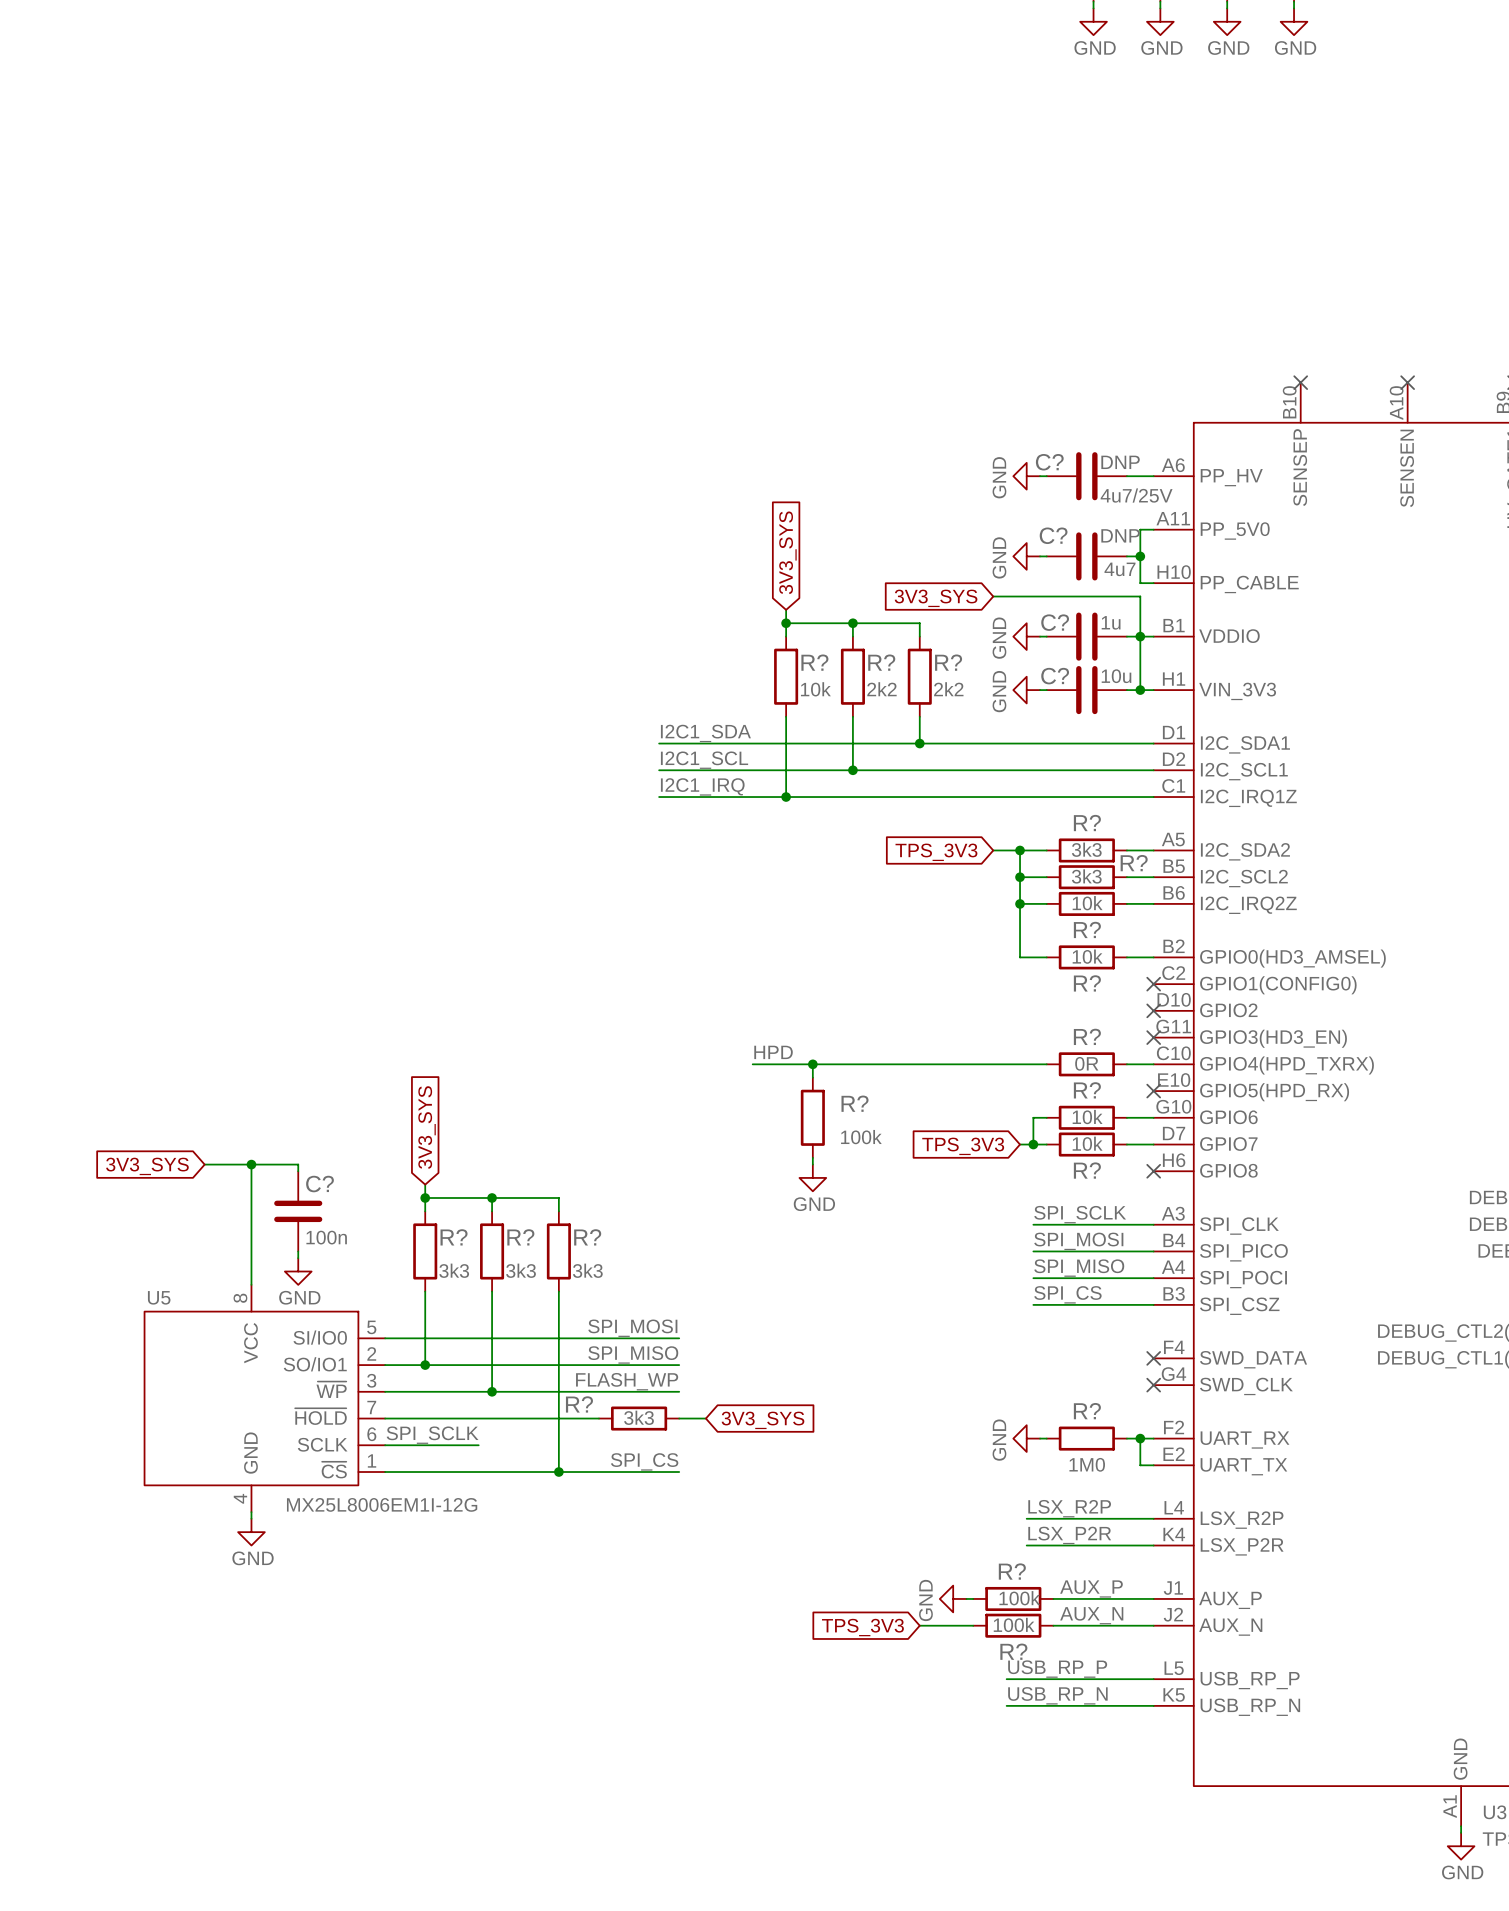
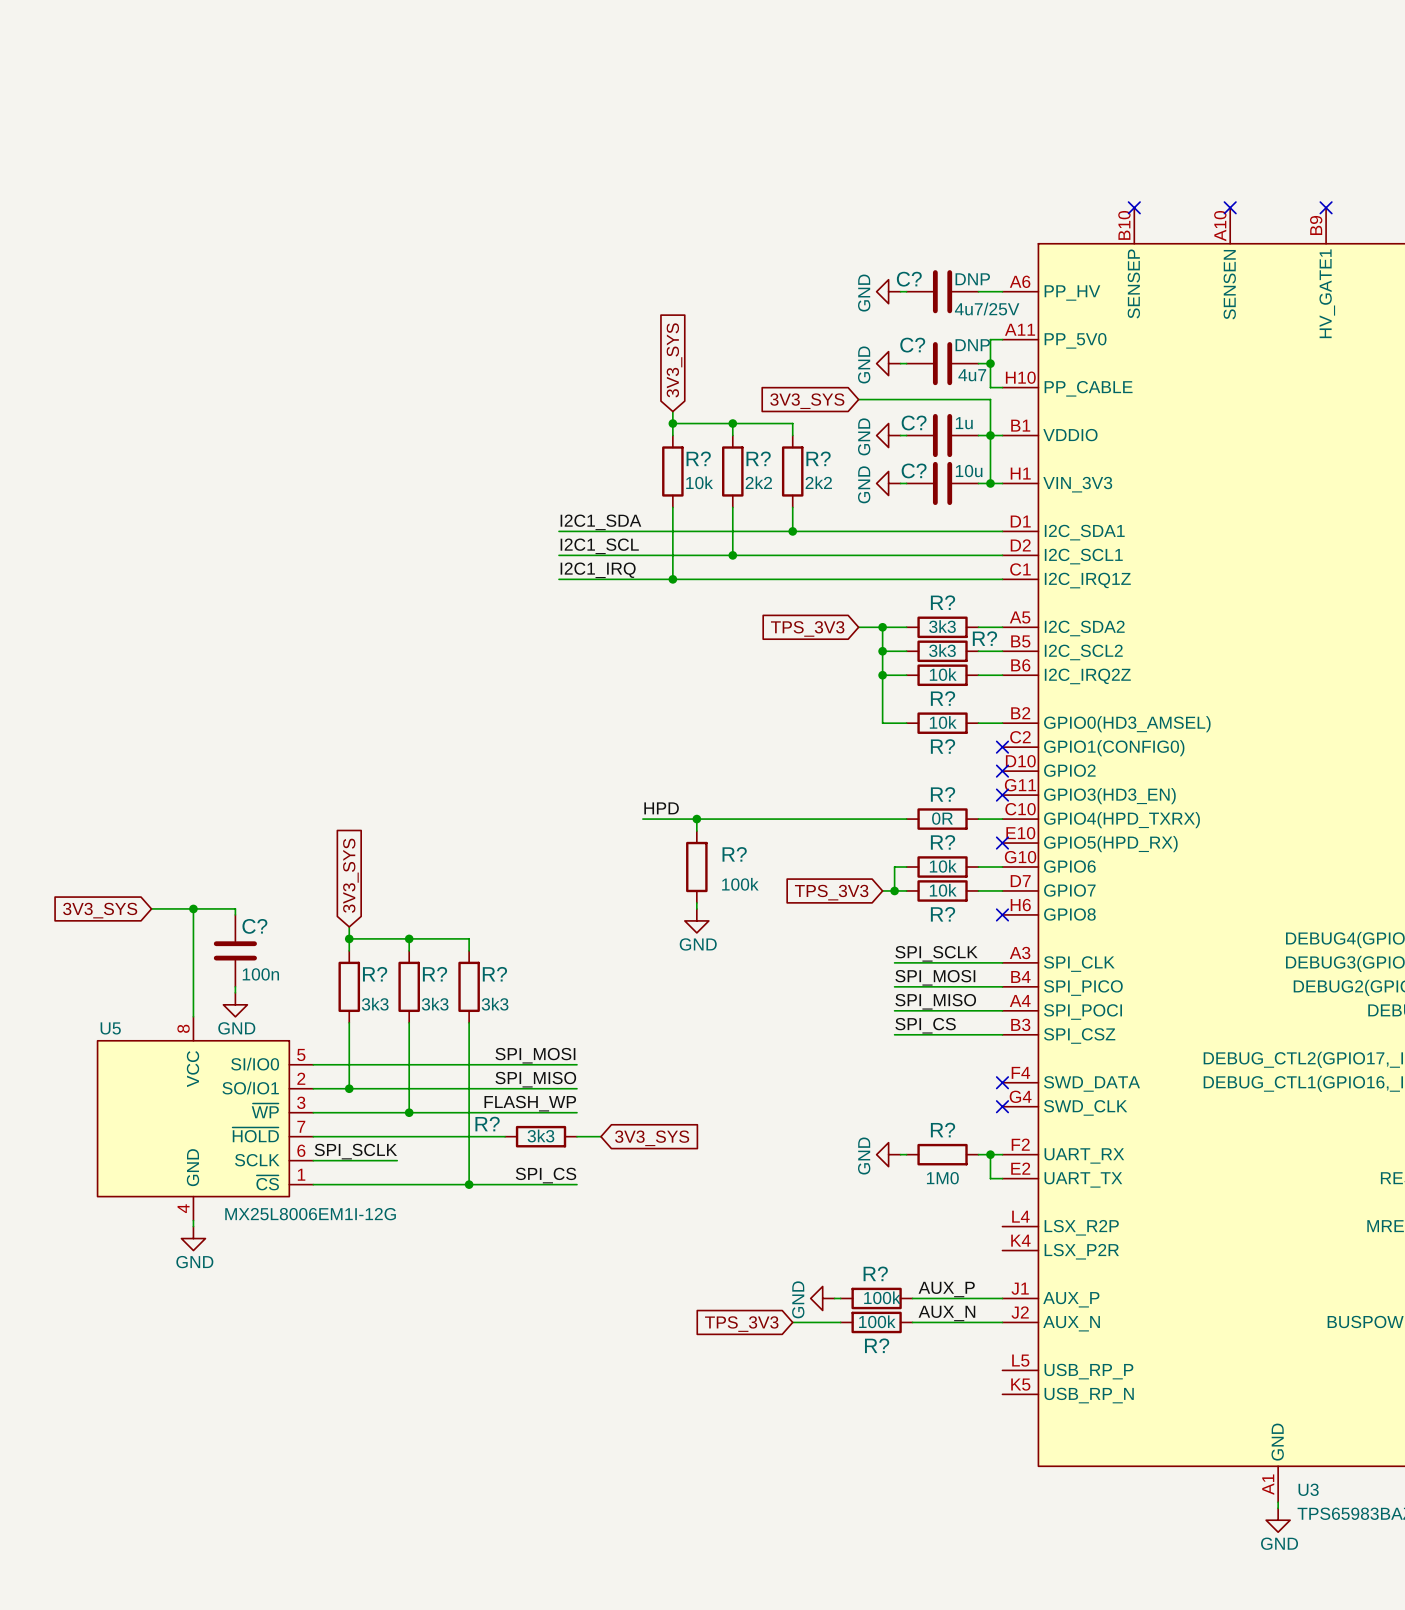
label: LSX_R2P (1069, 1508) -> none
wire: (1026, 1518) (1153, 1518) -> none
label: LSX_P2R (1069, 1535) -> none
wire: (1026, 1545) (1153, 1545) -> none
label: USB_RP_P (1057, 1669) -> none
wire: (1006, 1679) (1153, 1679) -> none
label: USB_RP_N (1057, 1695) -> none
wire: (1006, 1705) (1153, 1705) -> none

